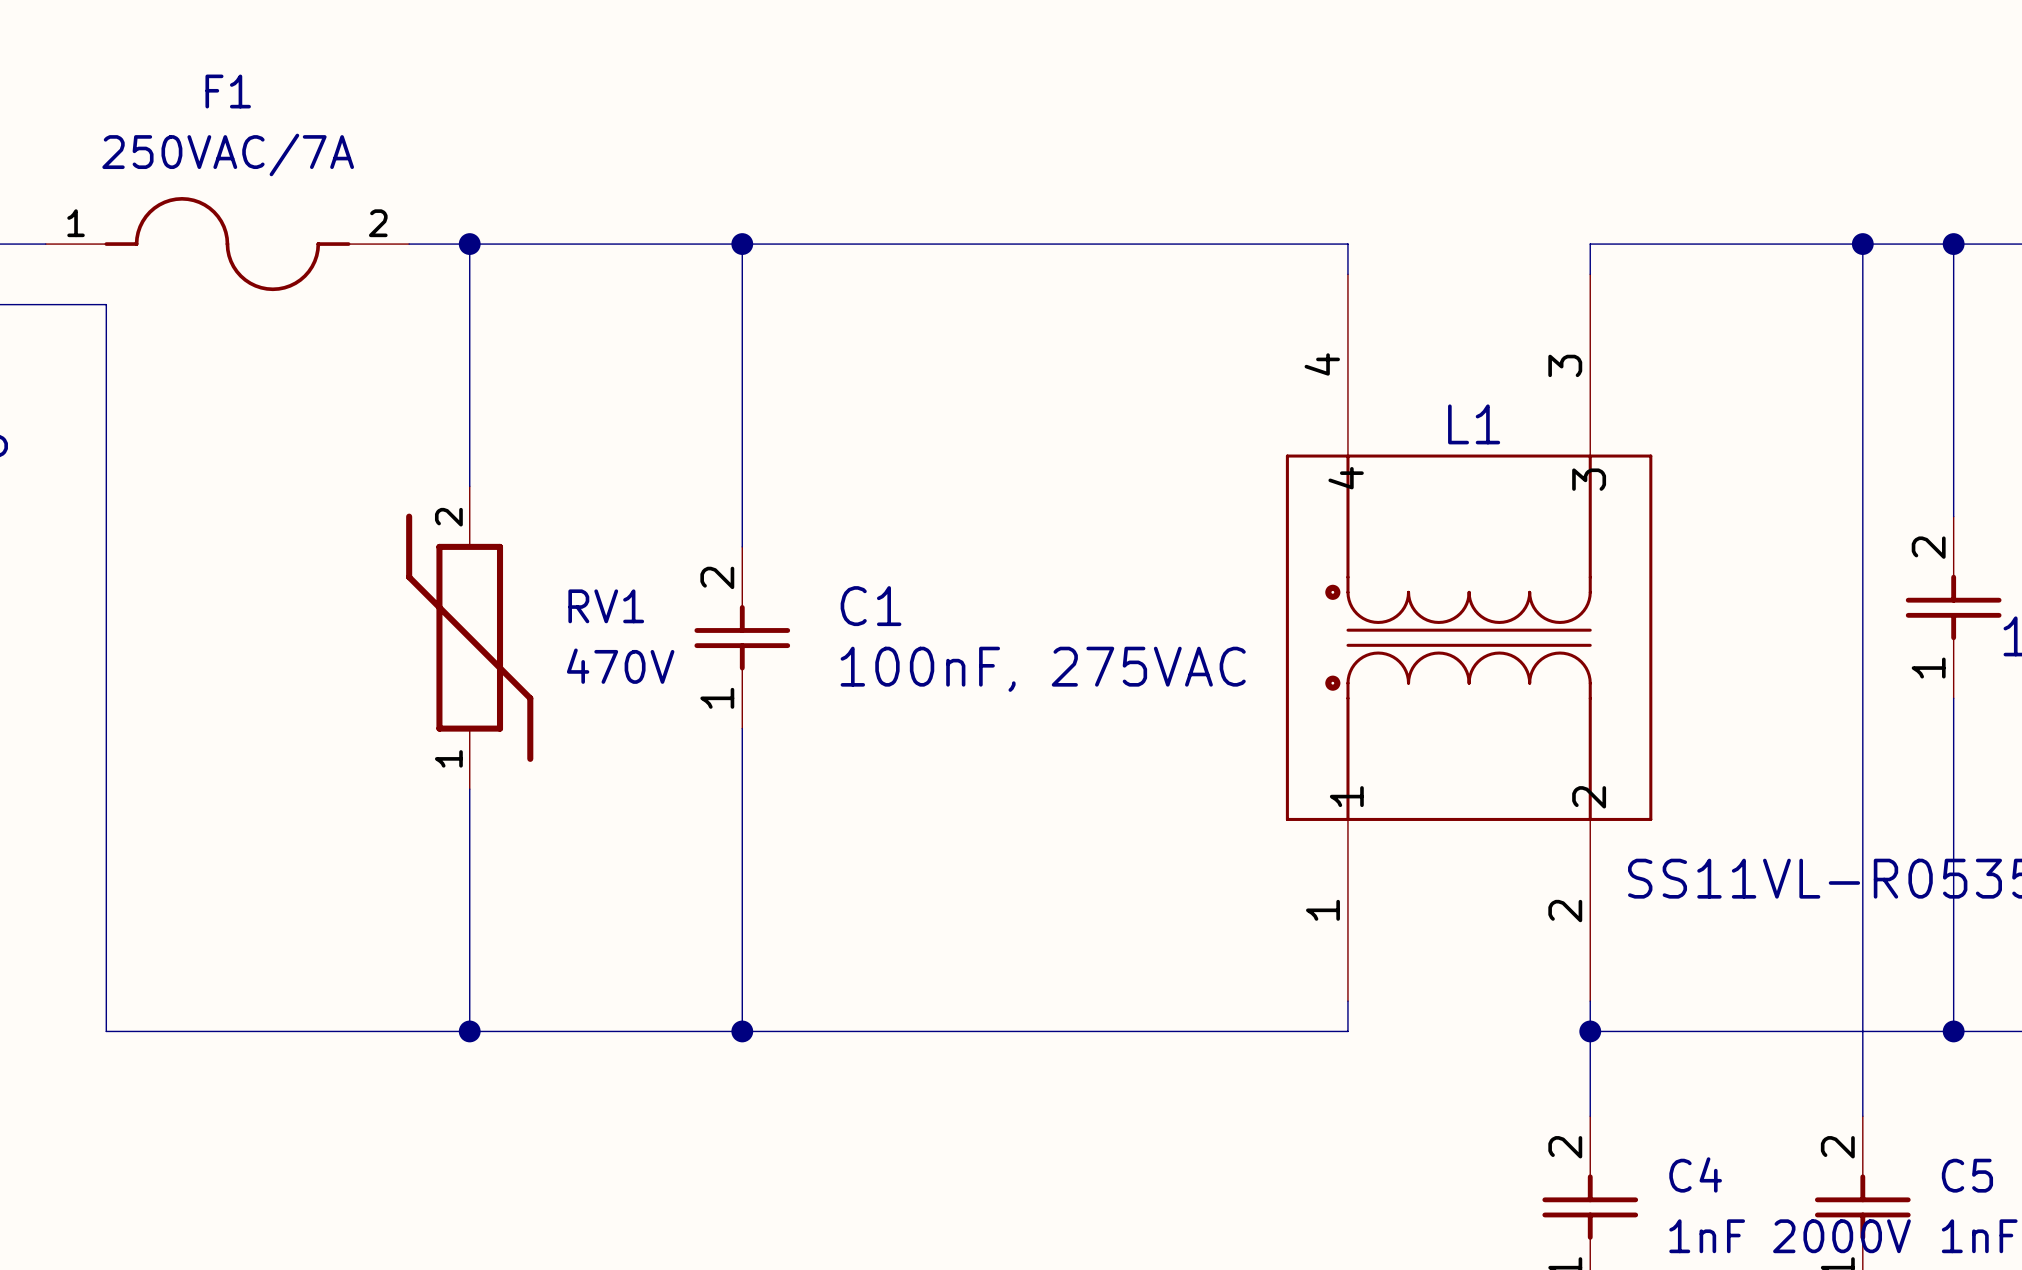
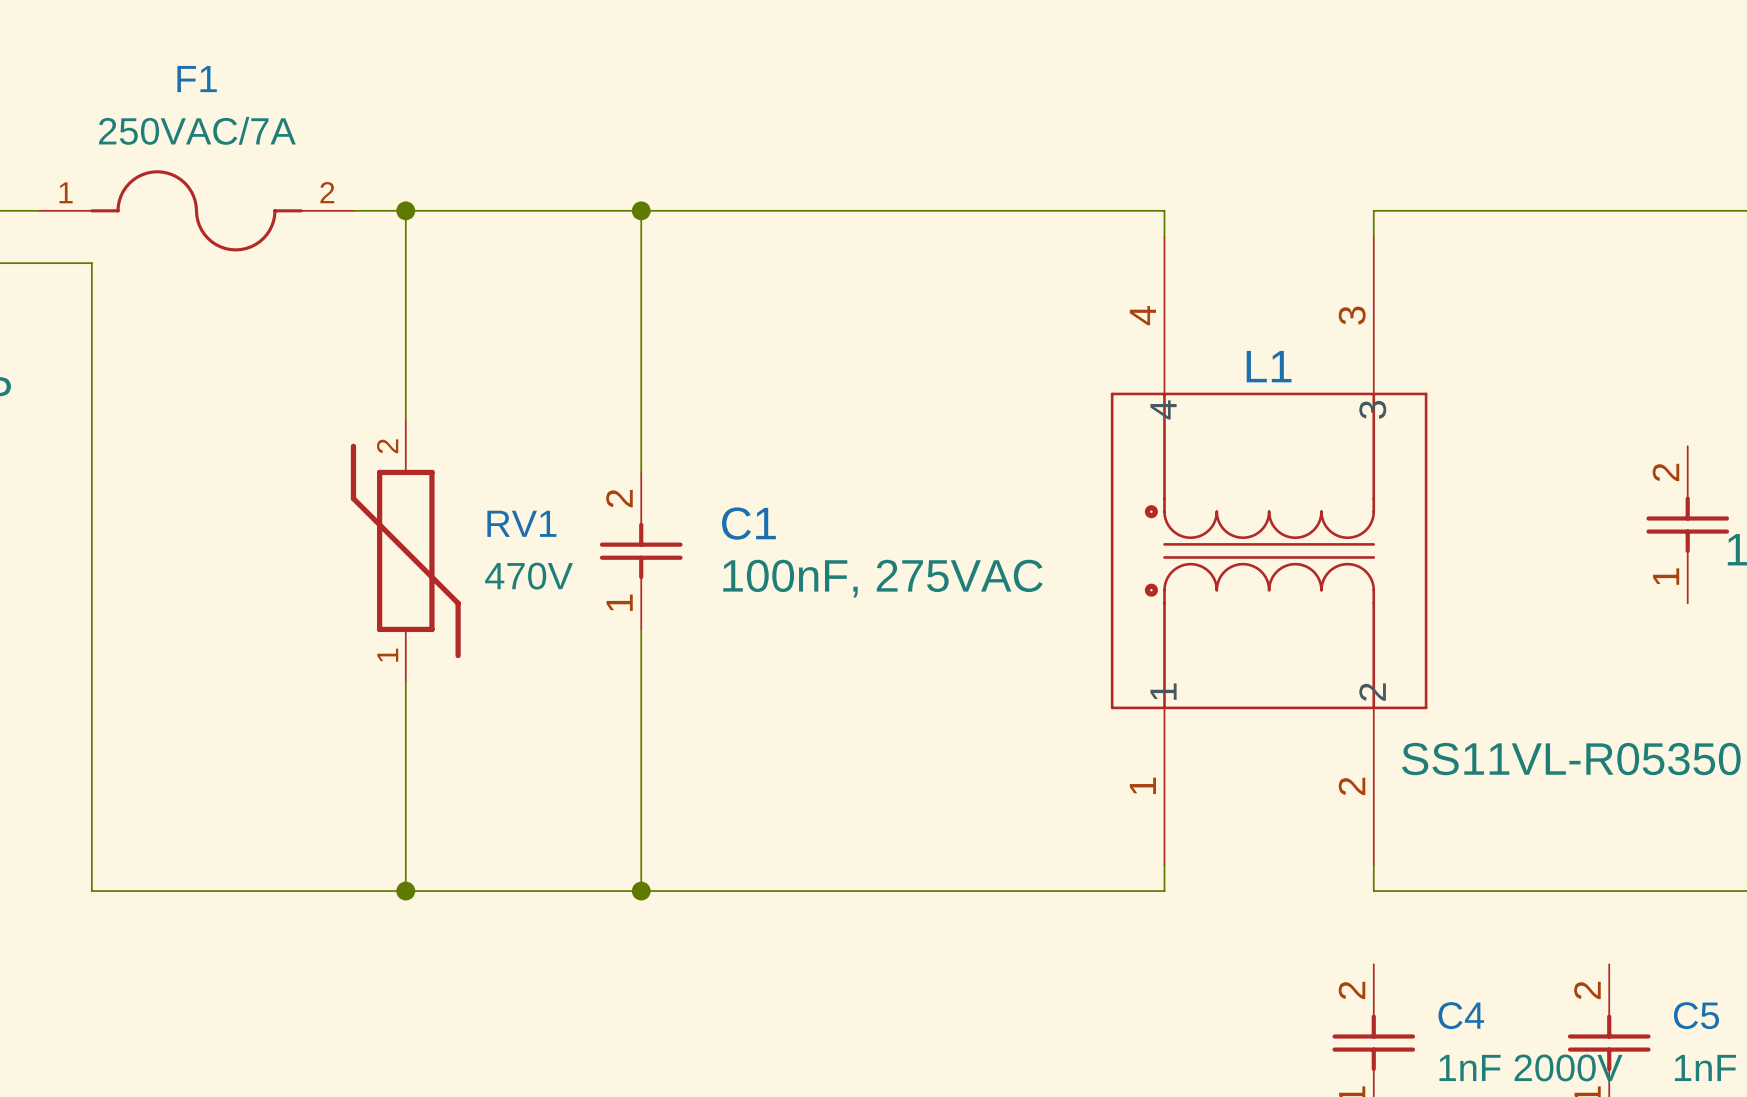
wire: (1862, 244) (1862, 1116) -> none
junction: (1862, 244) -> none
wire: (1953, 244) (1953, 516) -> none
junction: (1953, 244) -> none
wire: (1953, 698) (1953, 1031) -> none
wire: (1590, 1031) (1590, 1116) -> none
junction: (1590, 1031) -> none
junction: (1953, 1031) -> none

